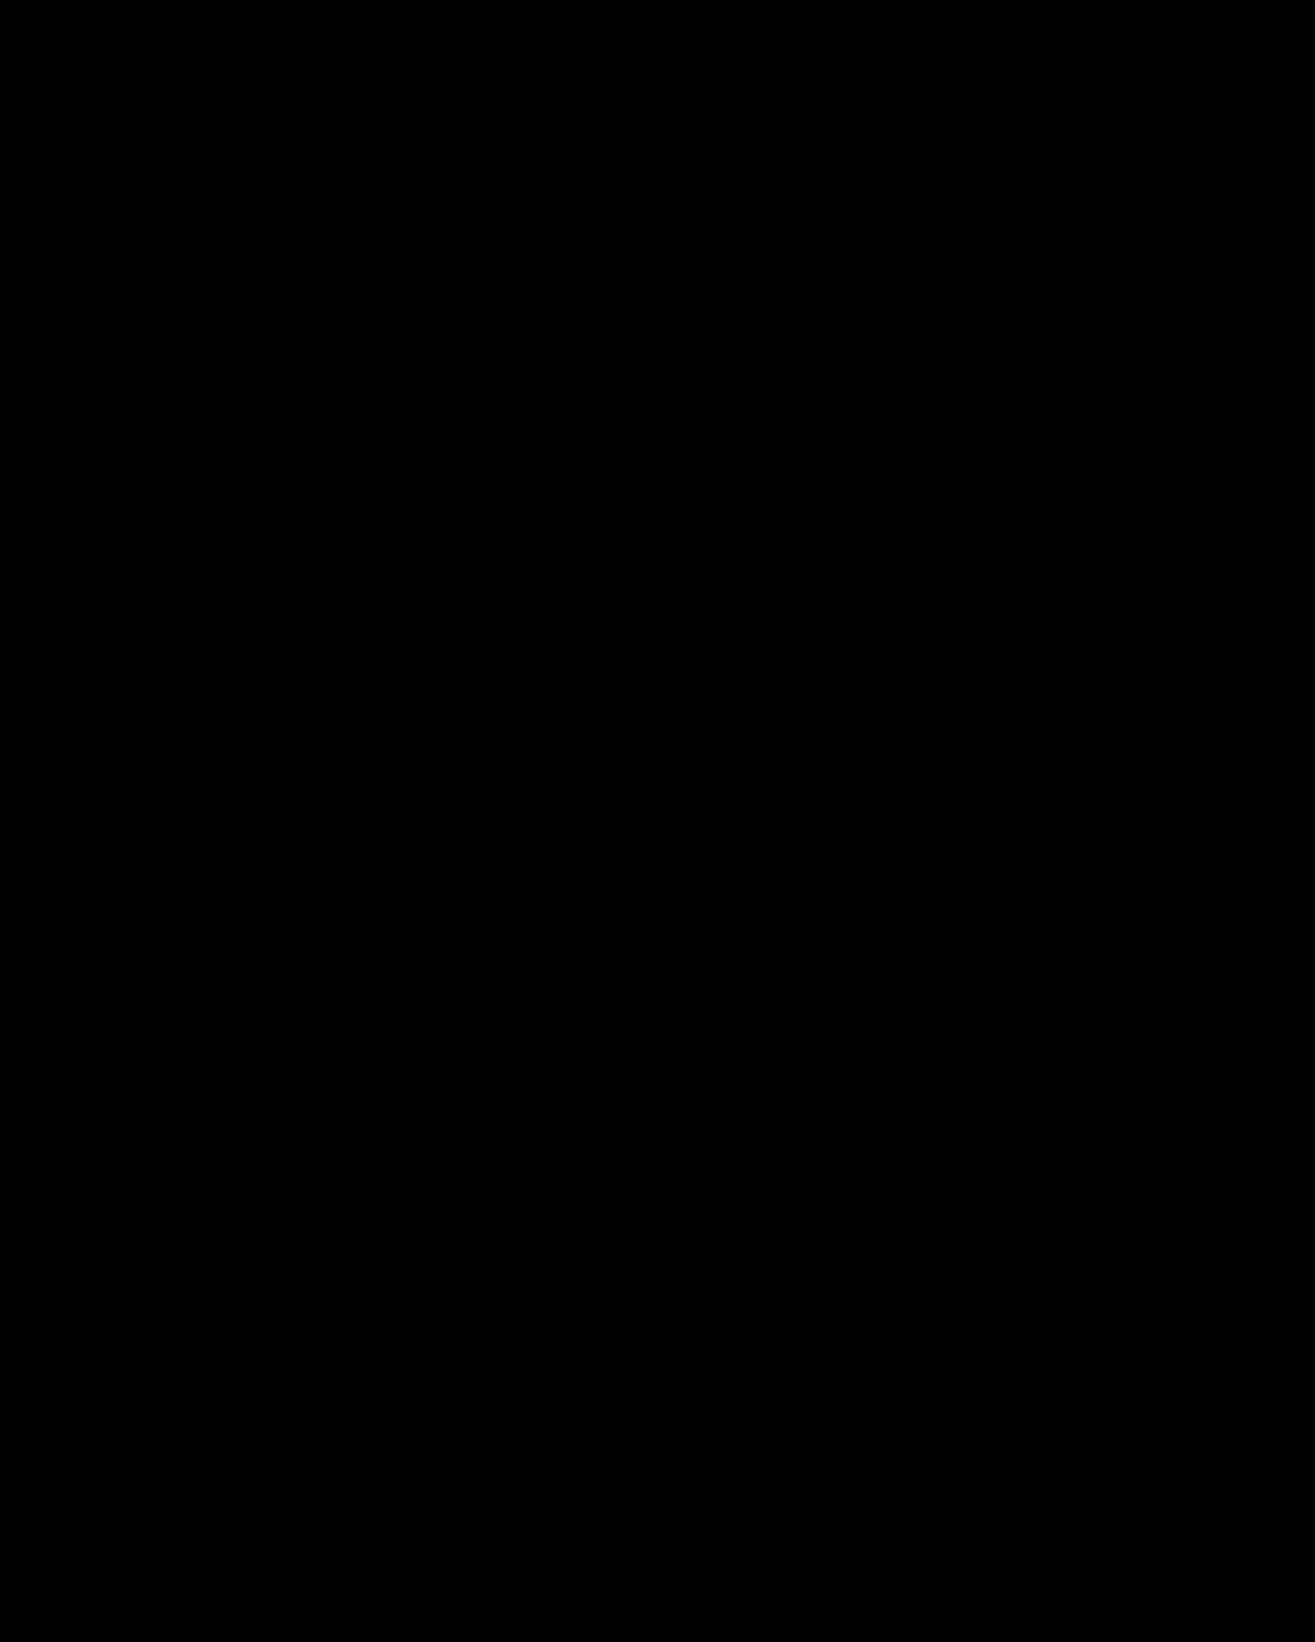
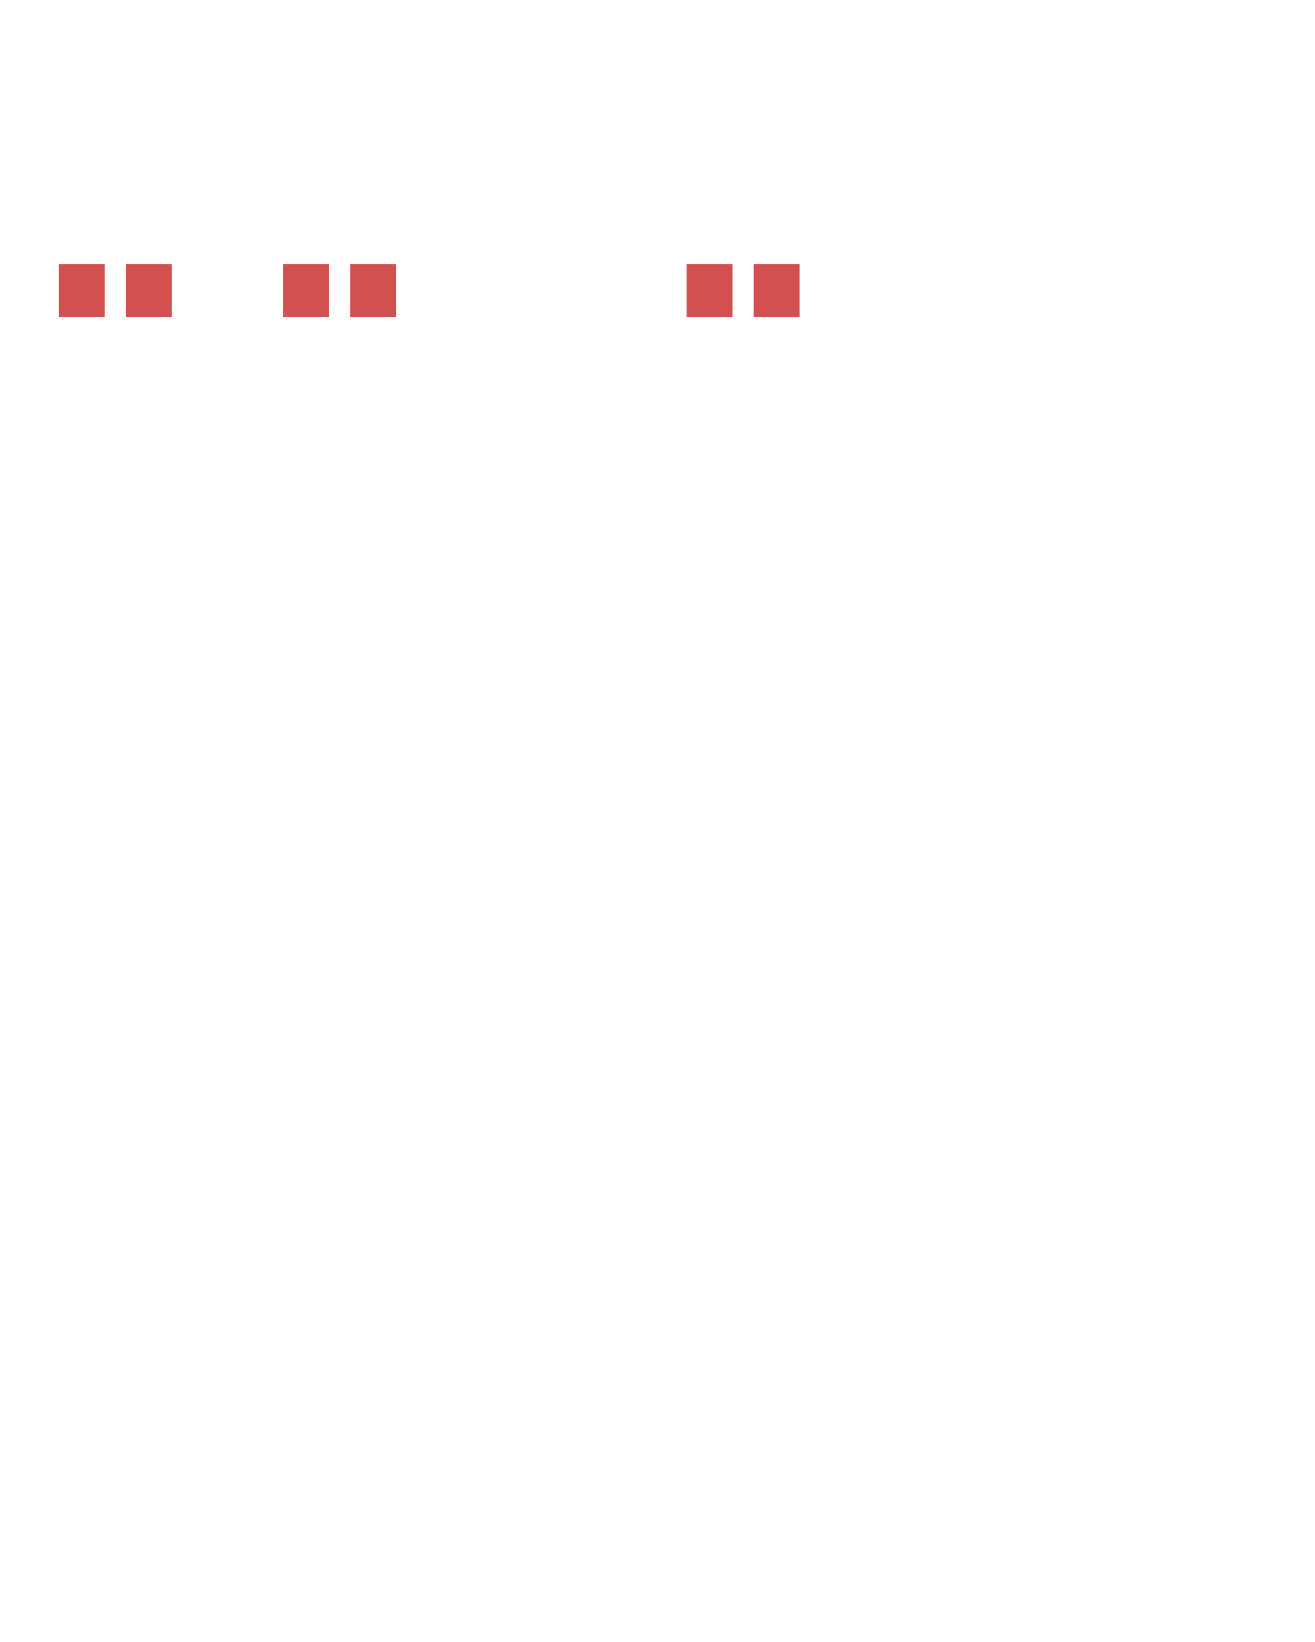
part: none -> (115, 290)
part: none -> (339, 290)
part: none -> (743, 290)

